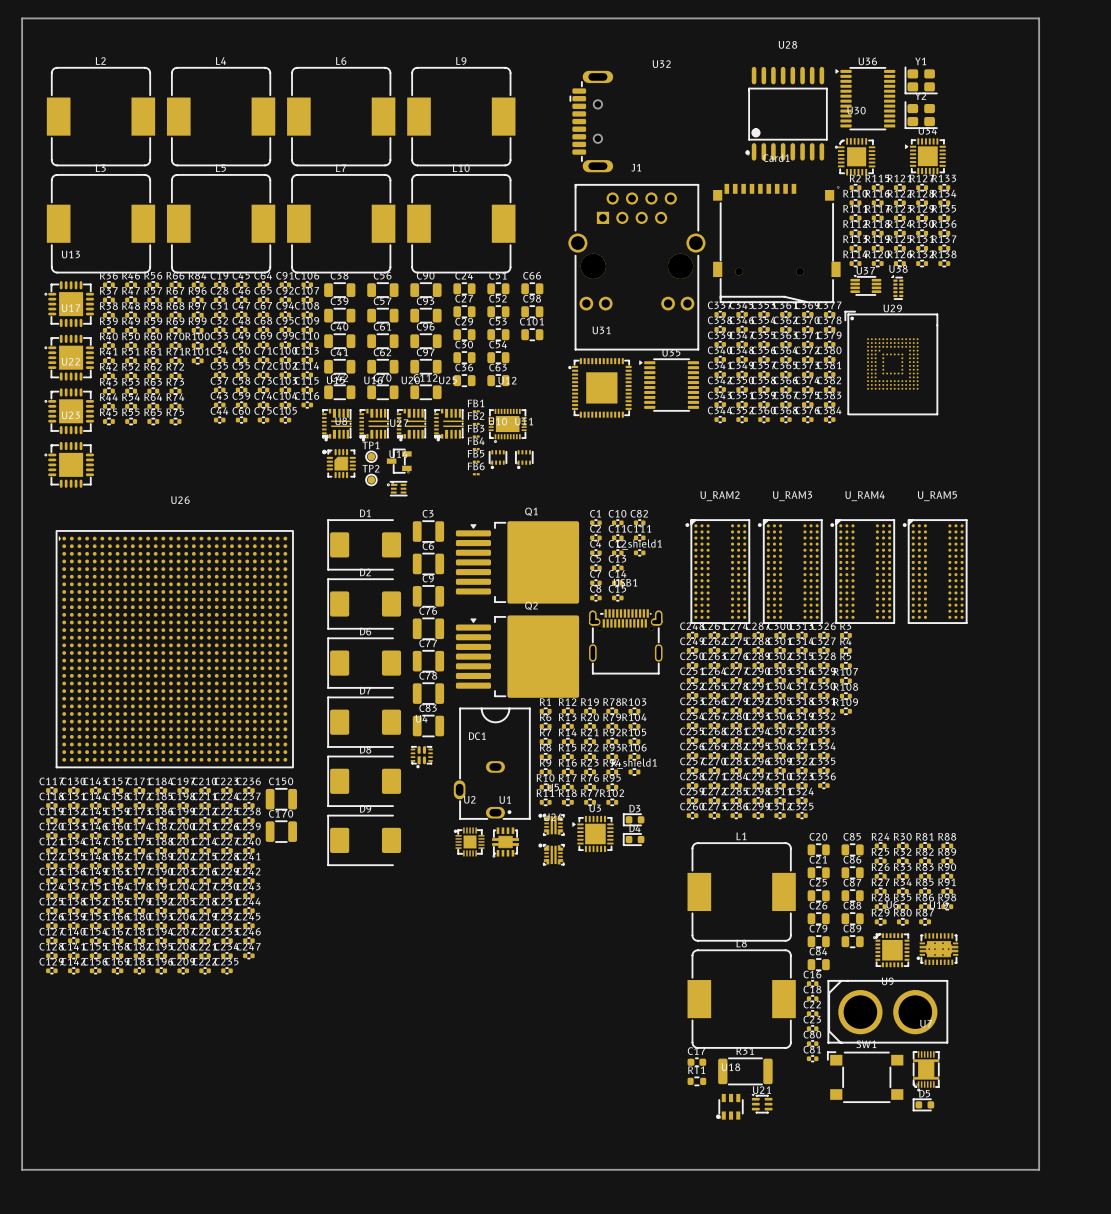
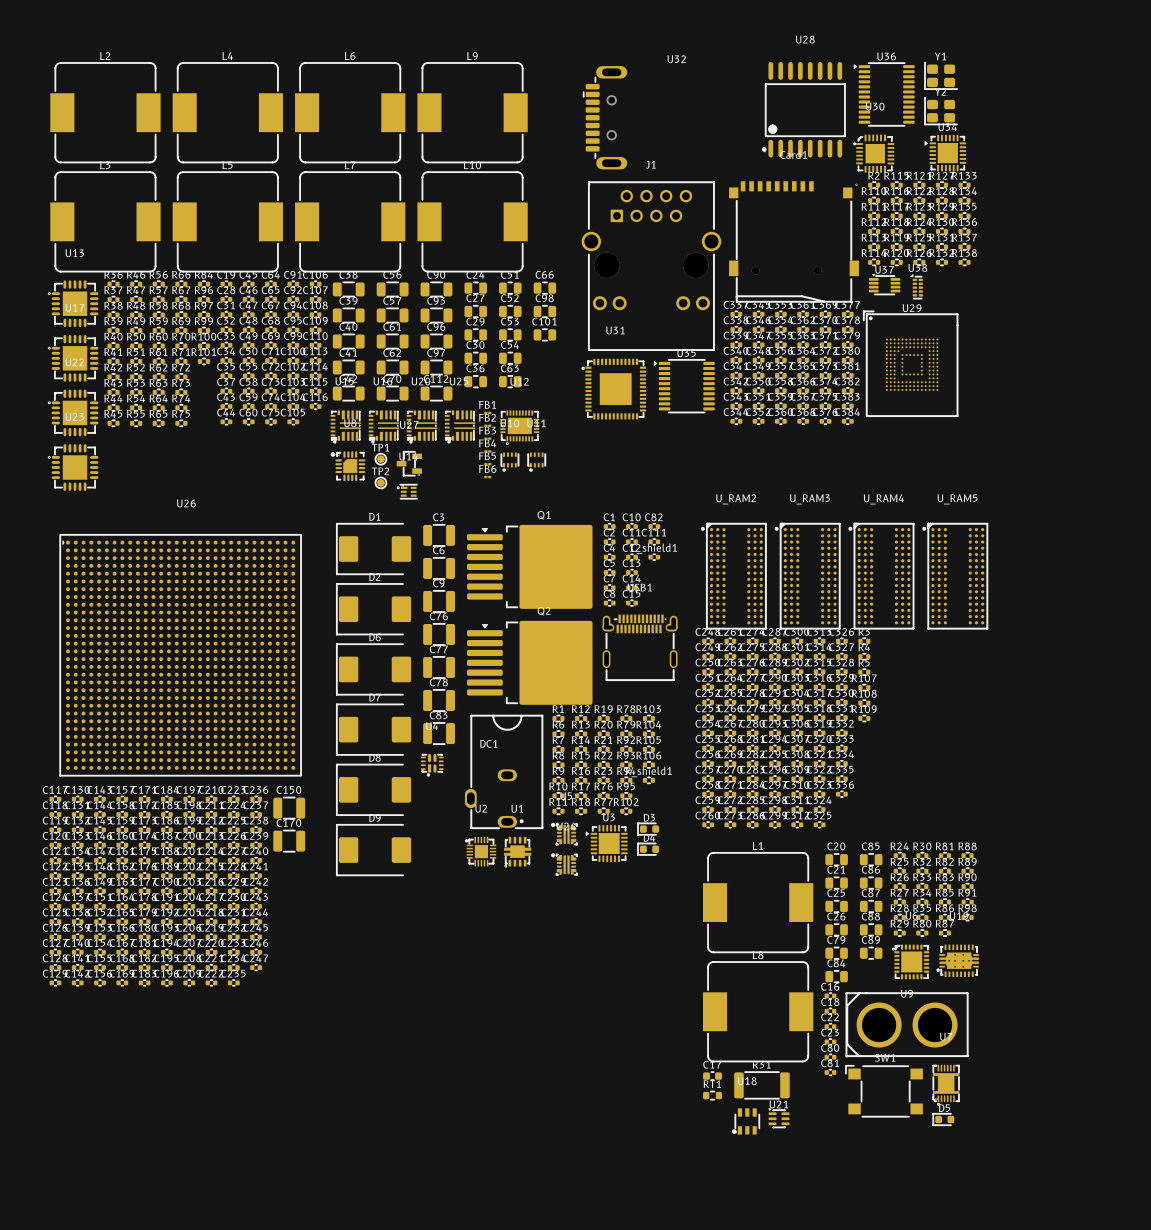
board edge: (22, 18) (1039, 18) (1039, 1169) (22, 1169) (22, 18) -> none

